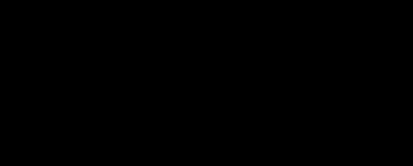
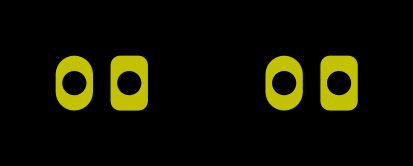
part: none -> (101, 83)
part: none -> (311, 83)

